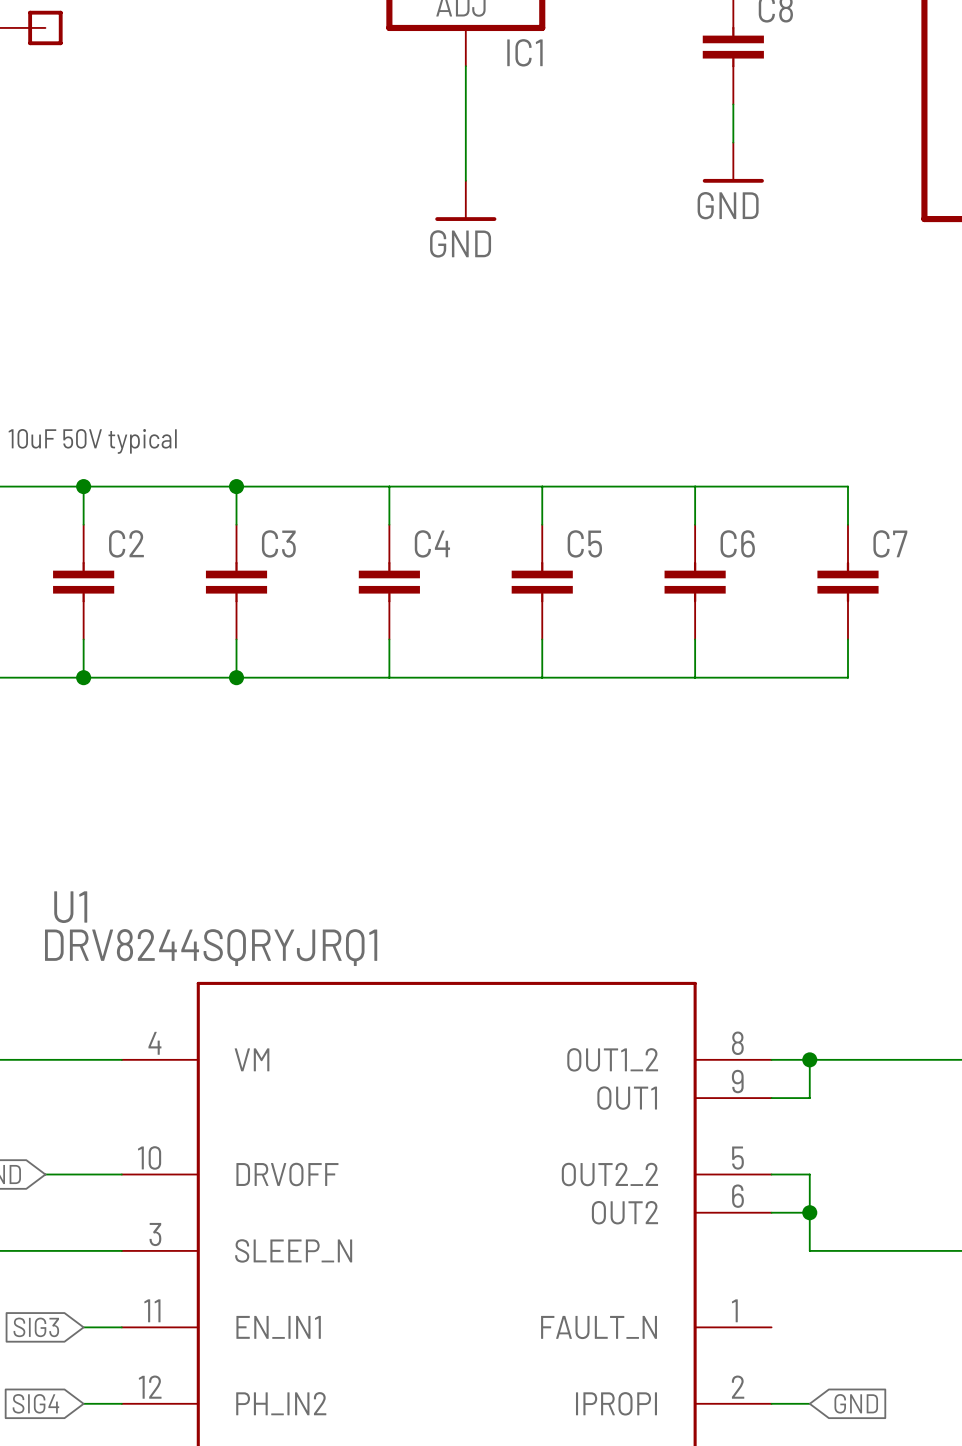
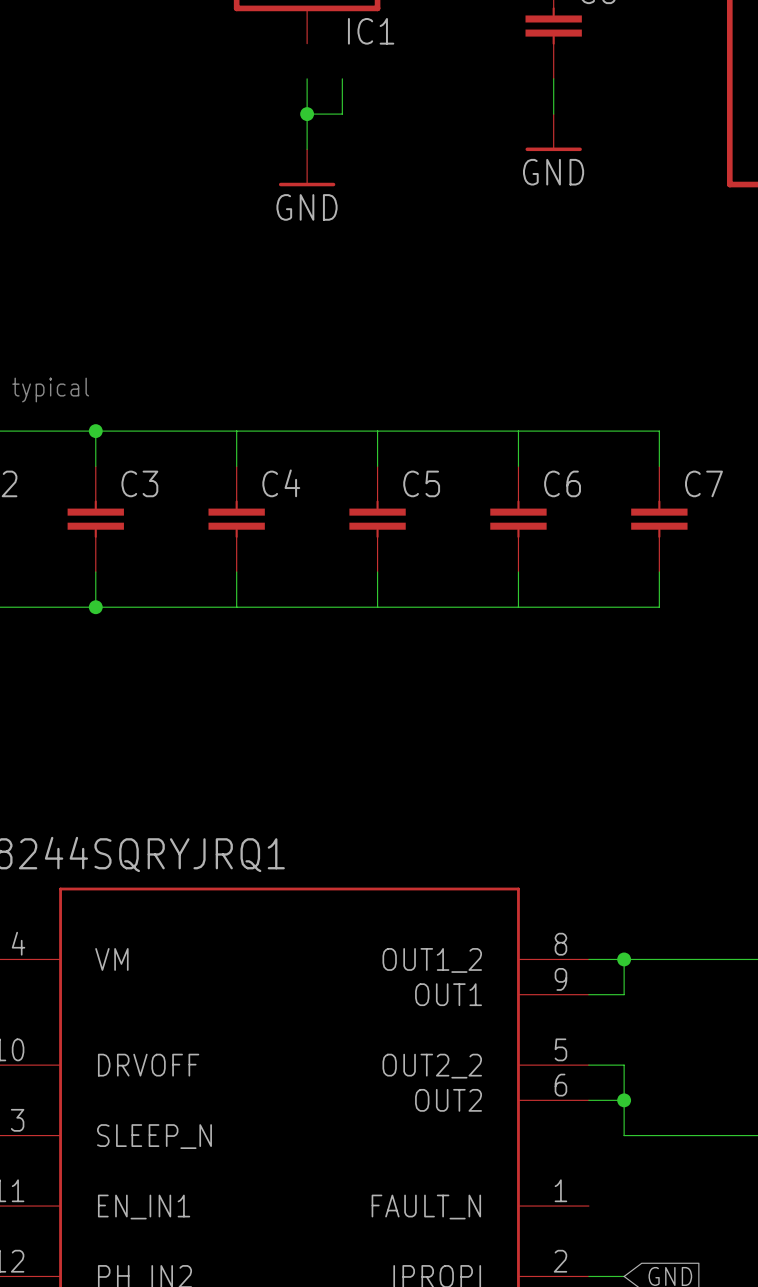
wire: (465, 66) (465, 104) -> none
wire: none -> (342, 78) (342, 114) (307, 114)
junction: none -> (307, 114)

